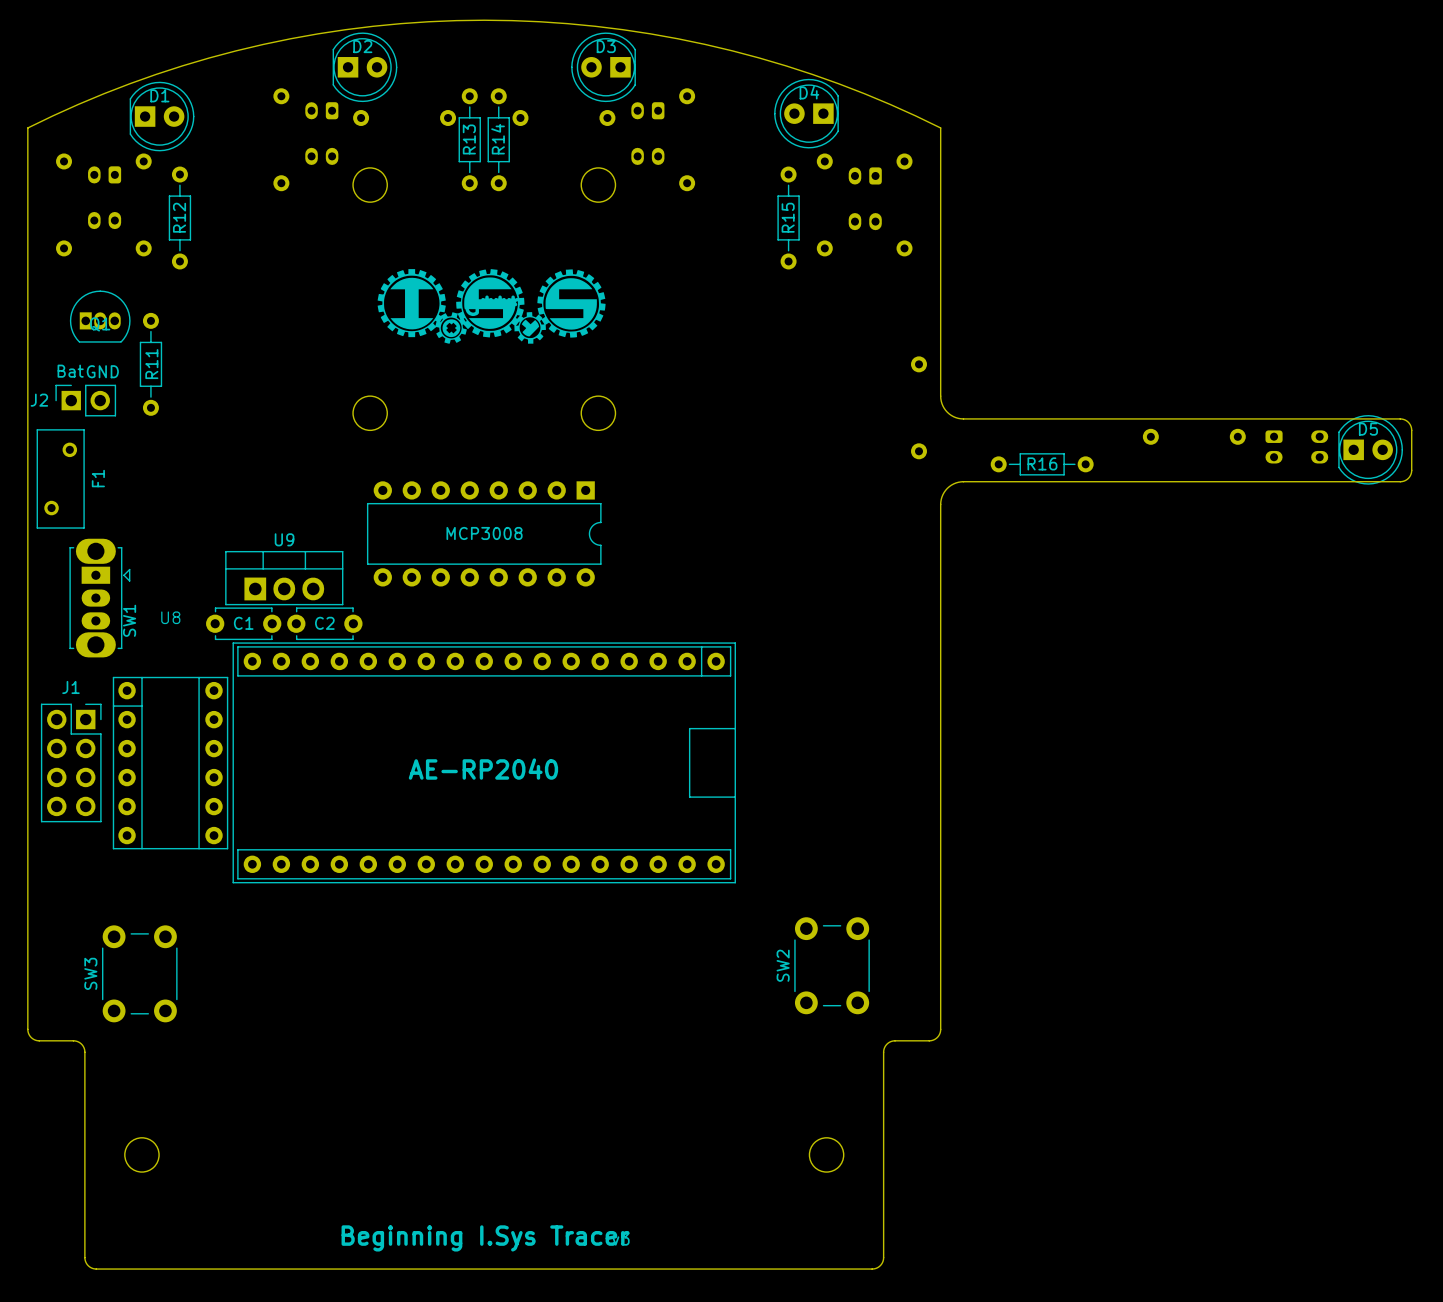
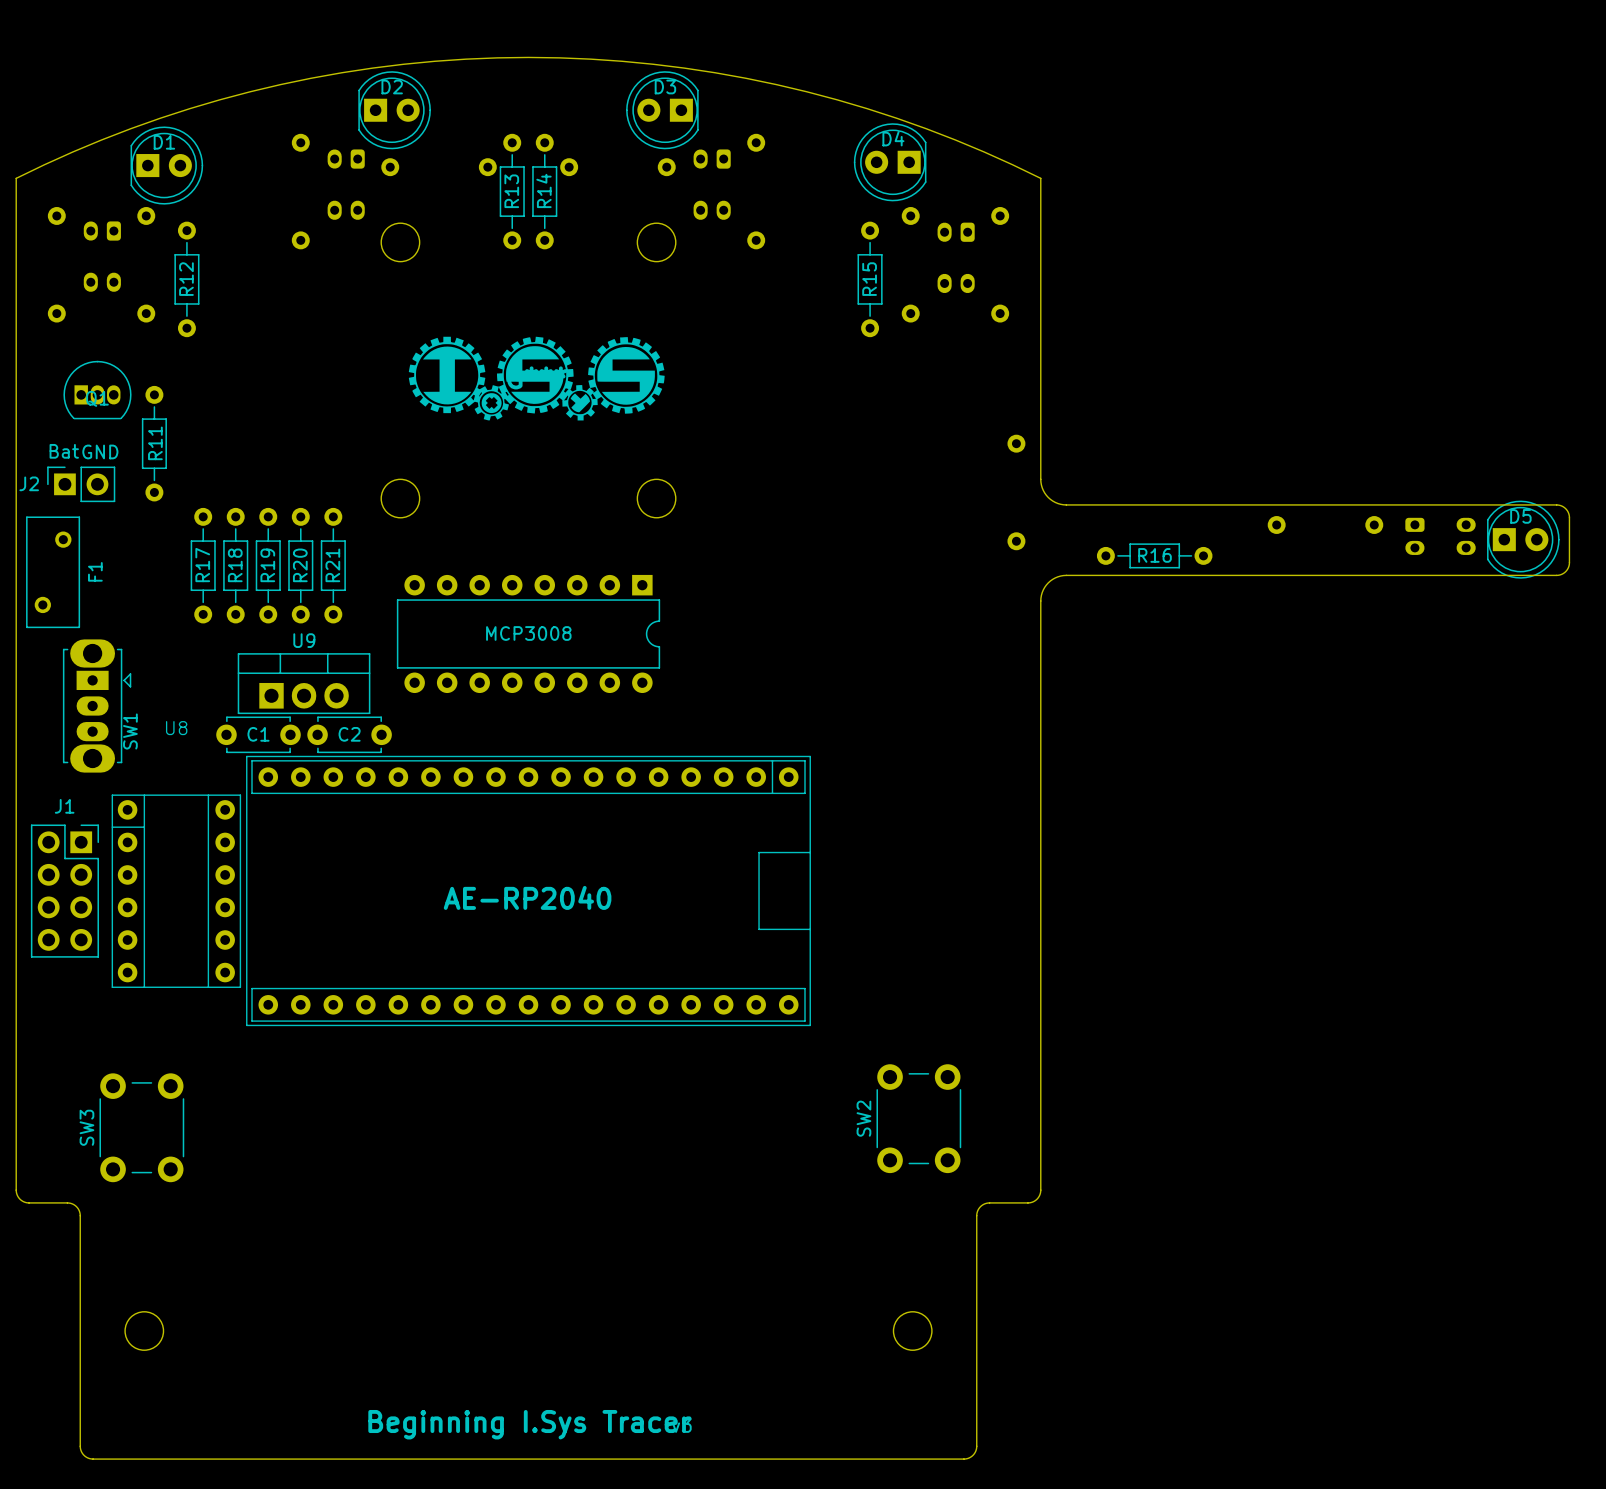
R17: none -> (203, 565)
R18: none -> (235, 565)
R19: none -> (268, 565)
R20: none -> (300, 565)
R21: none -> (333, 565)

